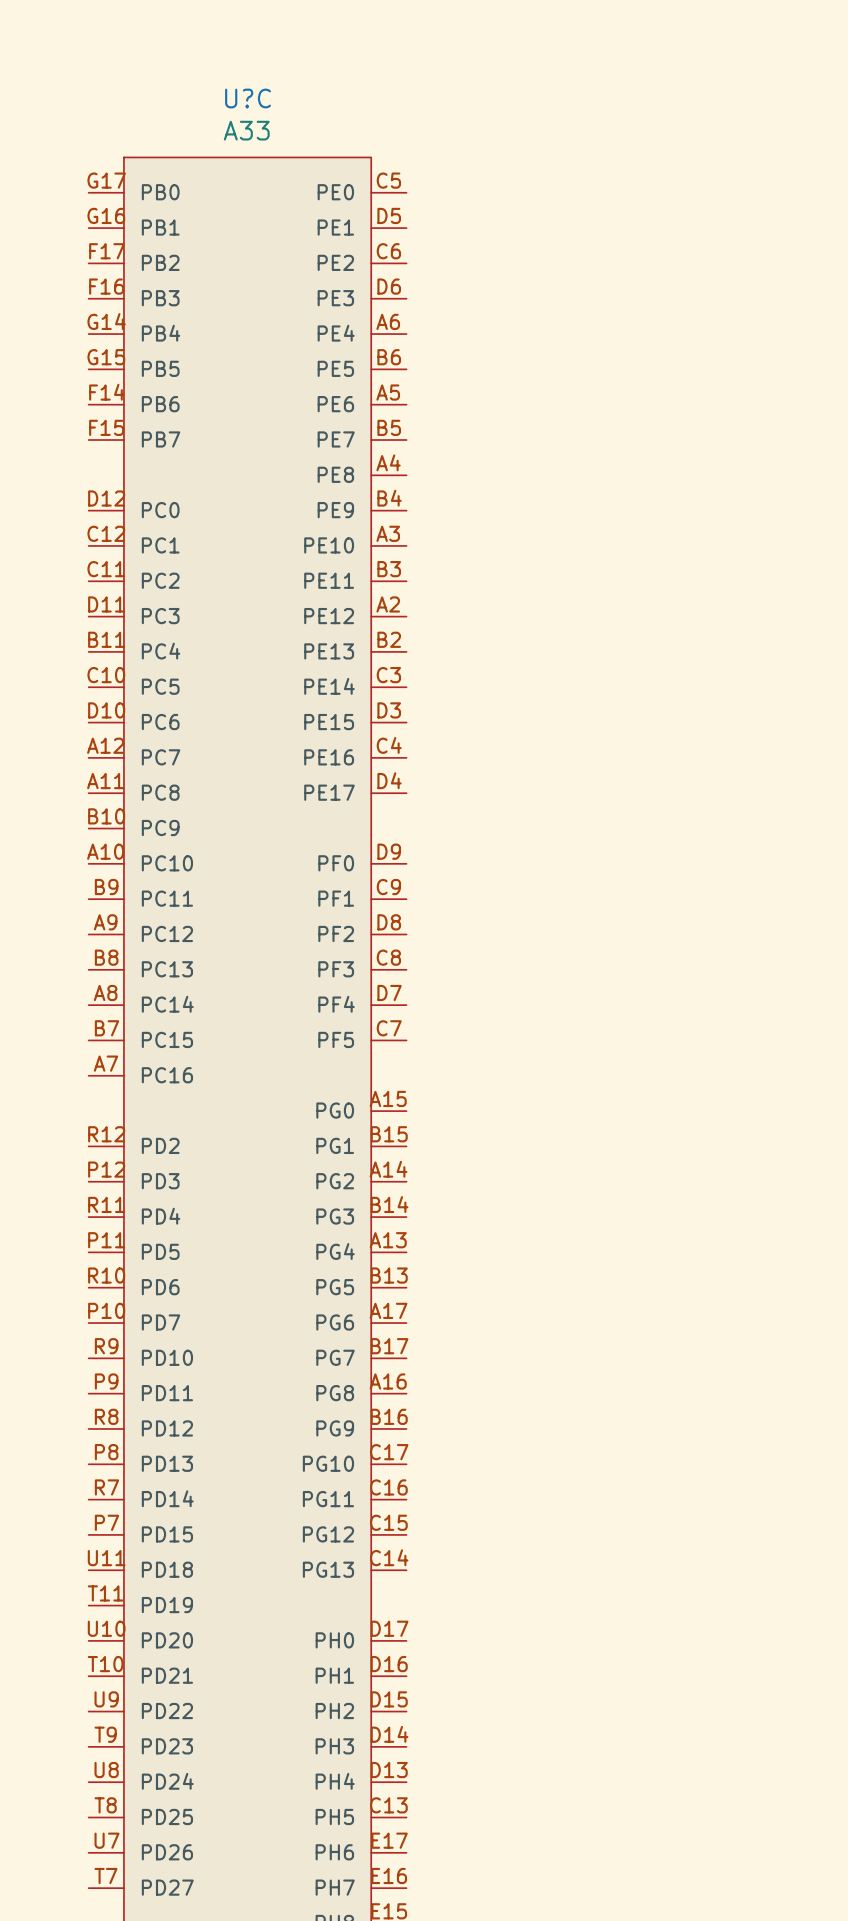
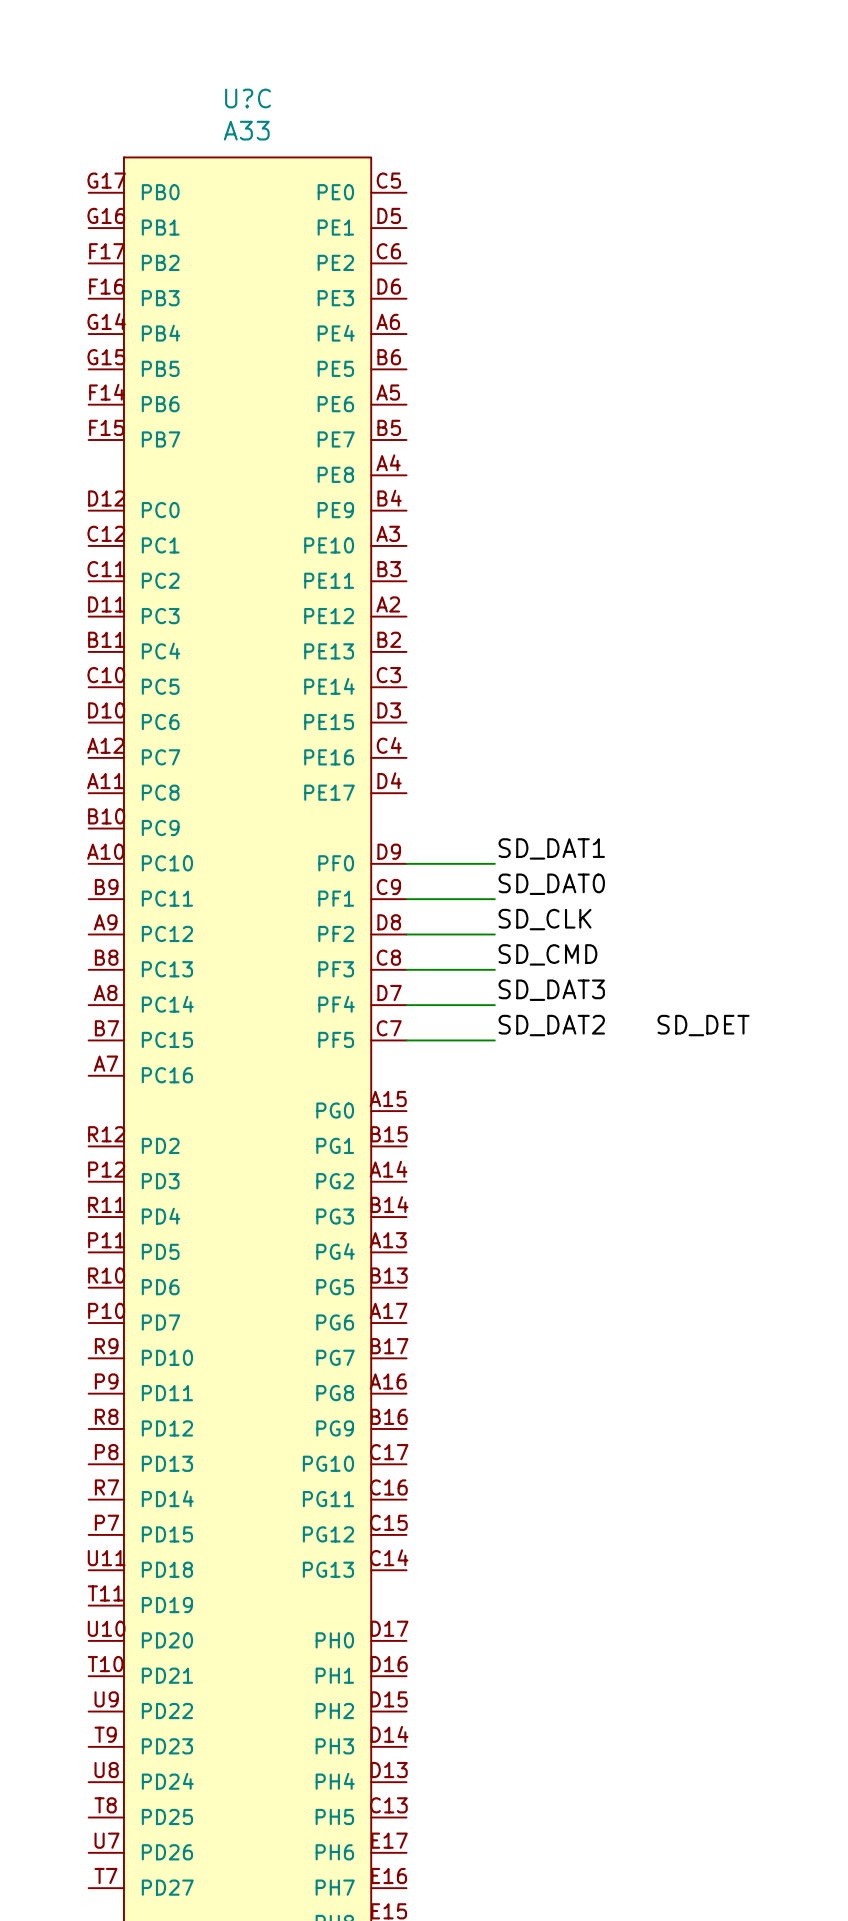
label: none -> SD_DAT1 (551, 848)
wire: none -> (406, 863) (494, 863)
label: none -> SD_DAT0 (551, 884)
wire: none -> (406, 899) (494, 899)
label: none -> SD_CLK (545, 919)
wire: none -> (406, 934) (494, 934)
label: none -> SD_CMD (547, 954)
wire: none -> (406, 969) (494, 969)
label: none -> SD_DAT3 (551, 990)
wire: none -> (406, 1005) (494, 1005)
label: none -> SD_DAT2 (551, 1025)
label: none -> SD_DET (703, 1025)
wire: none -> (406, 1040) (494, 1040)

